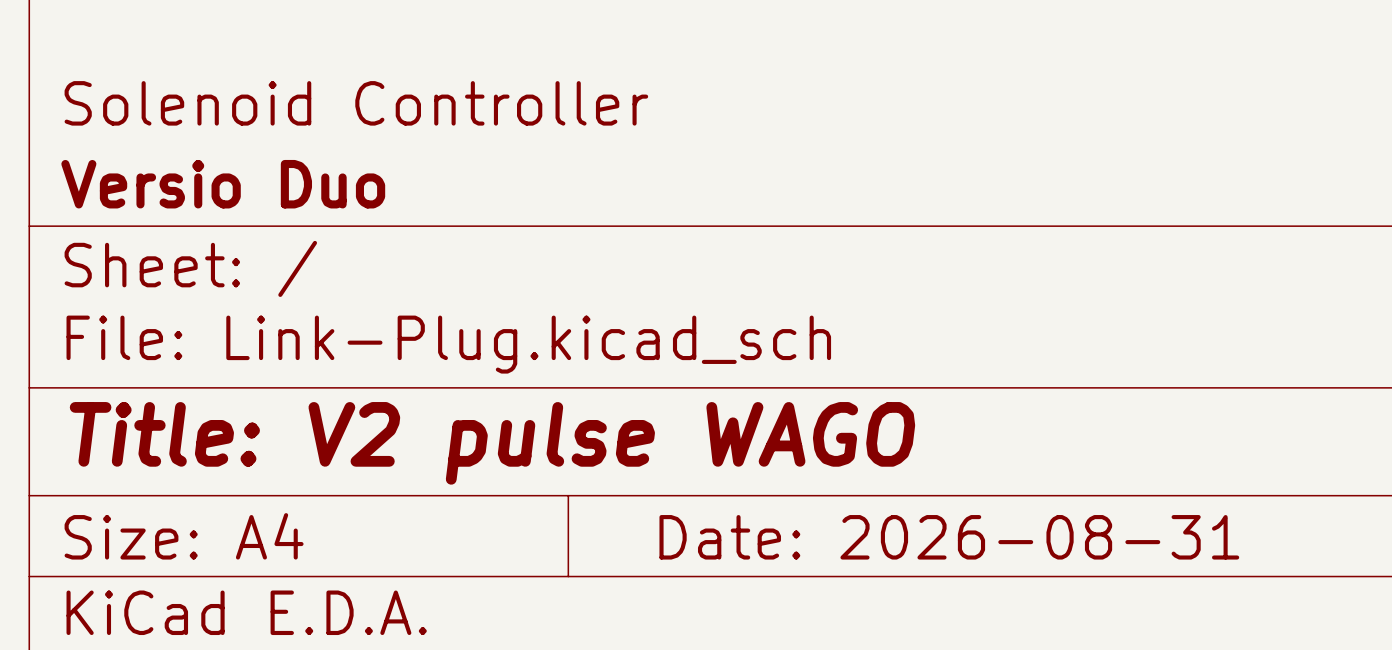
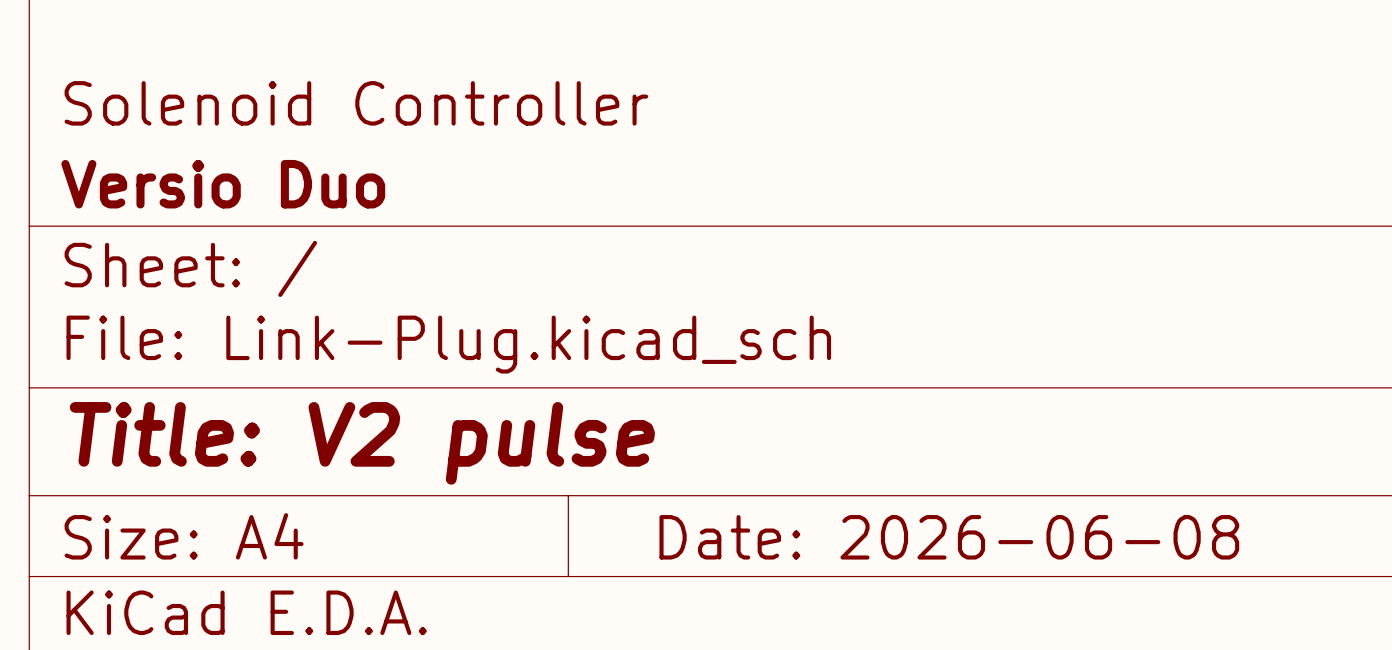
title block: Title: V2 pulse WAGO (492, 443) -> Title: V2 pulse (362, 443)
title block: Date: 2026-08-31 (949, 537) -> Date: 2026-06-08 (949, 537)

